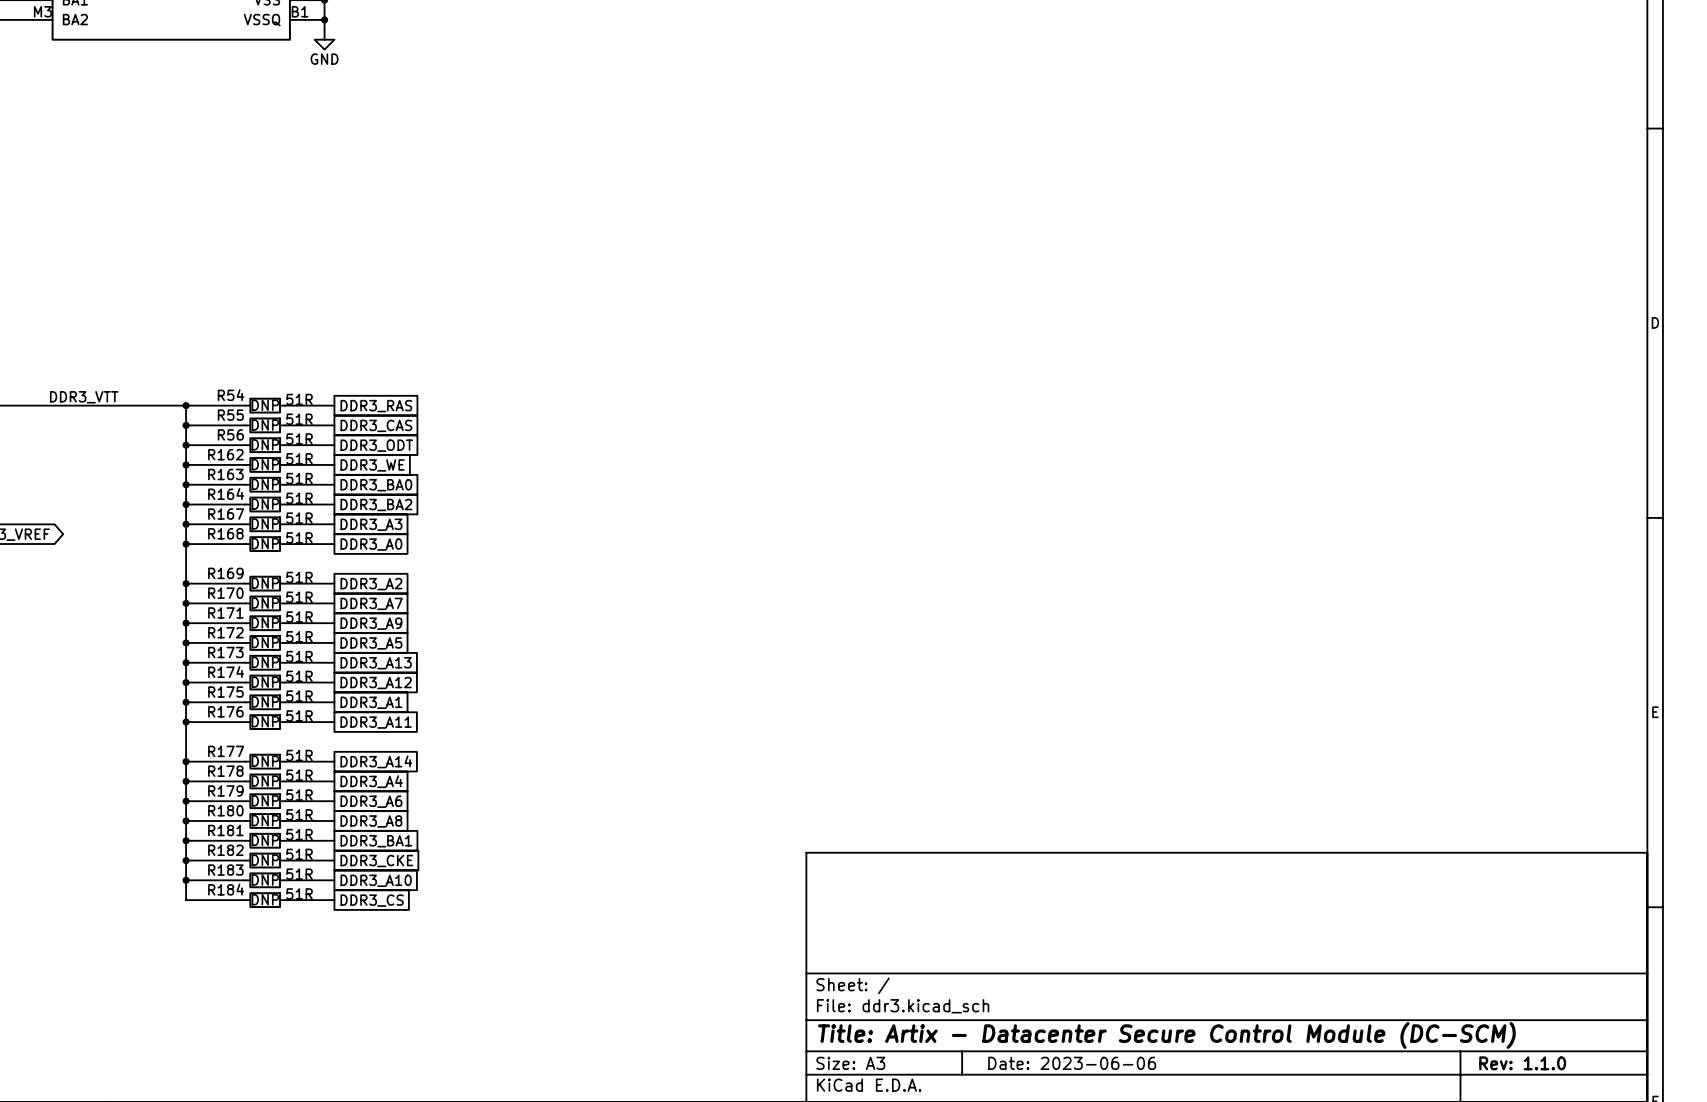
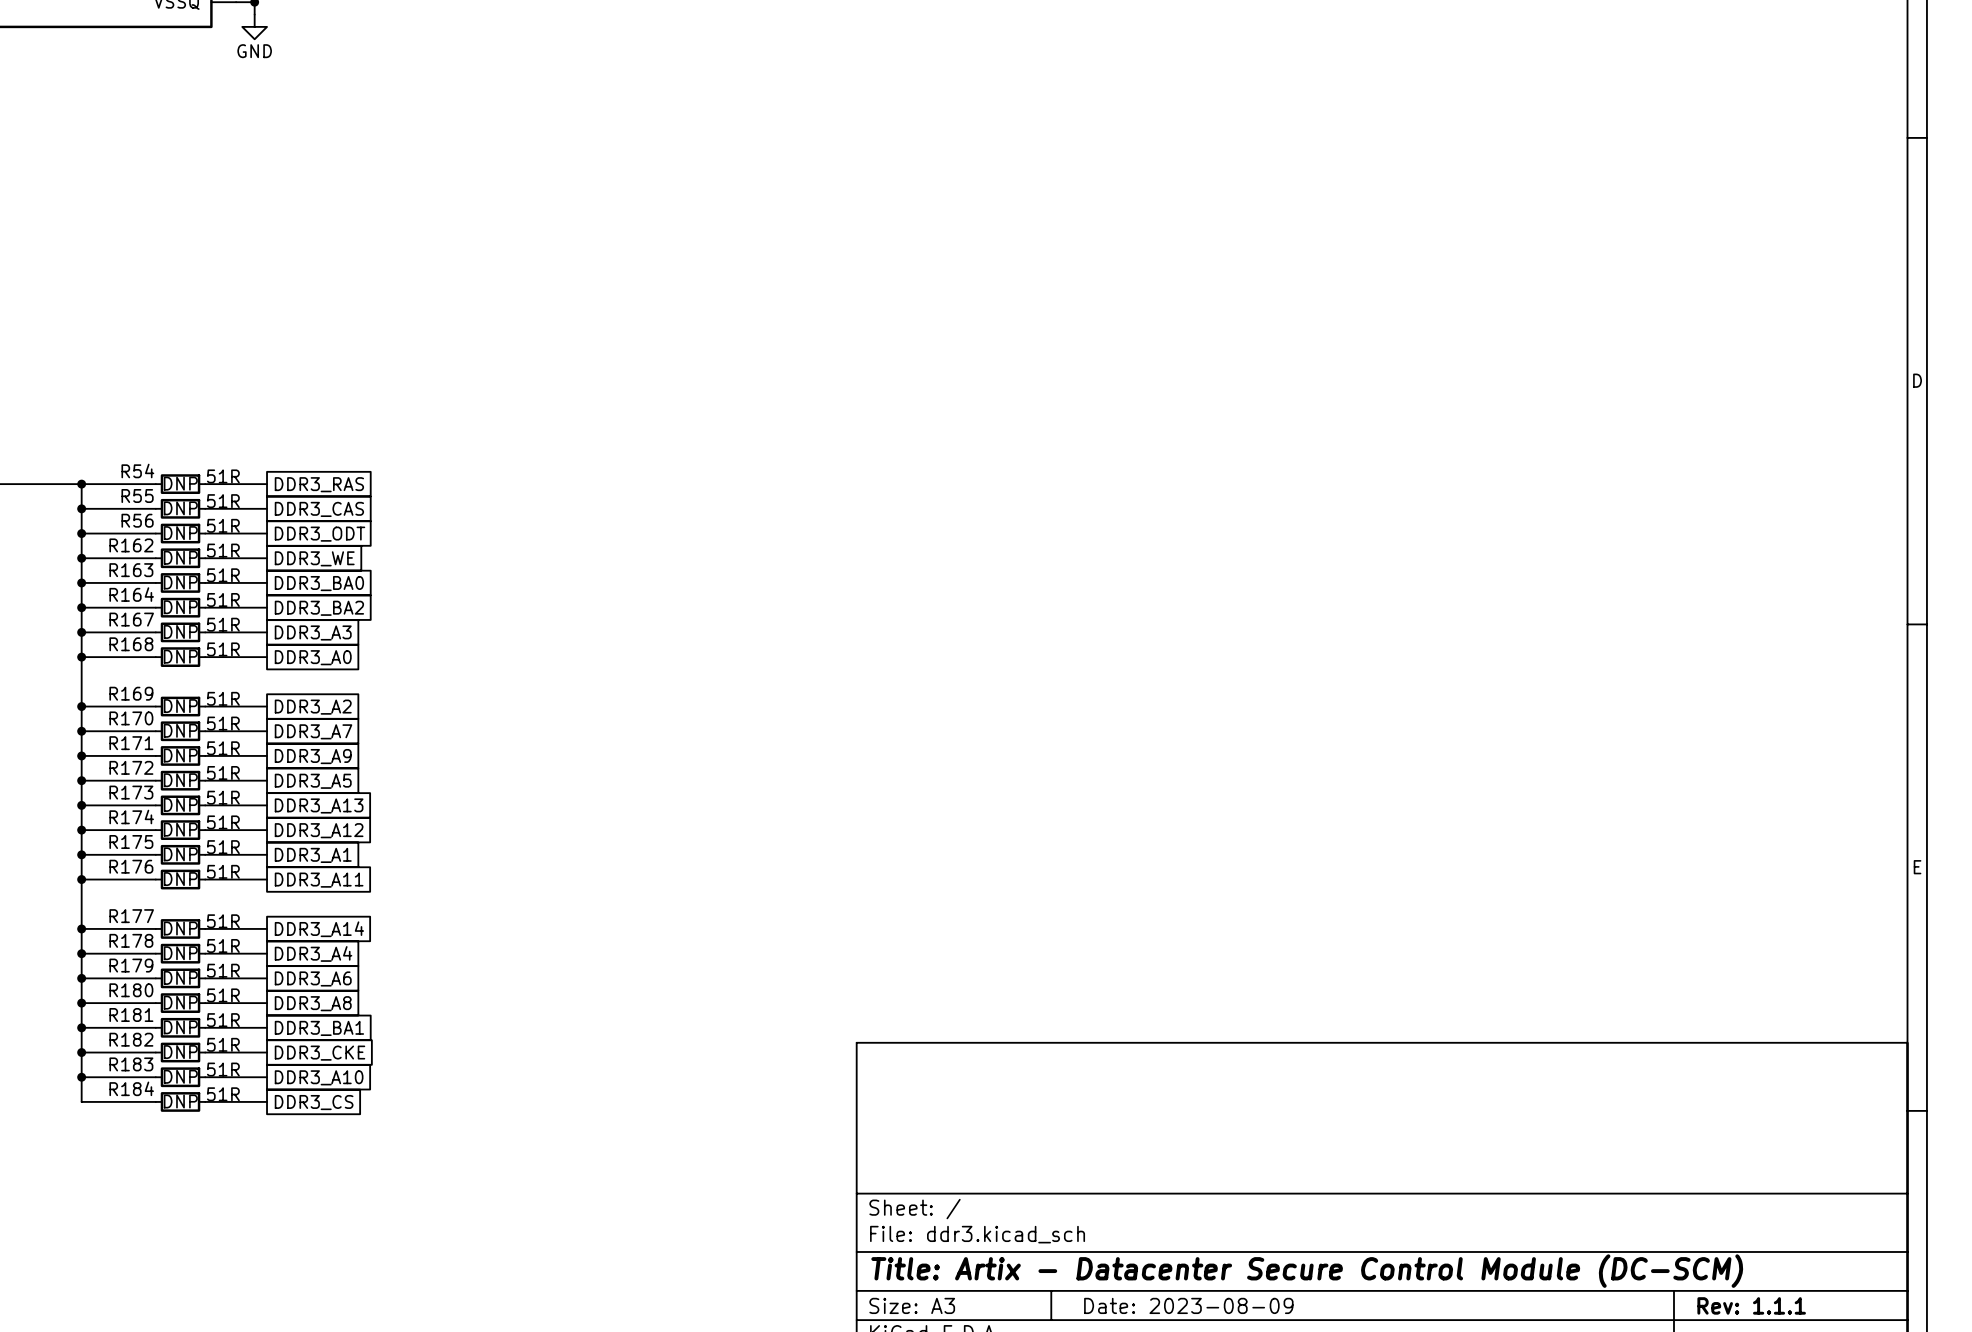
title block: Date: 2023-06-06 (1072, 1063) -> Date: 2023-08-09 (1188, 1305)
title block: Rev: 1.1.0 (1522, 1063) -> Rev: 1.1.1 (1751, 1305)

